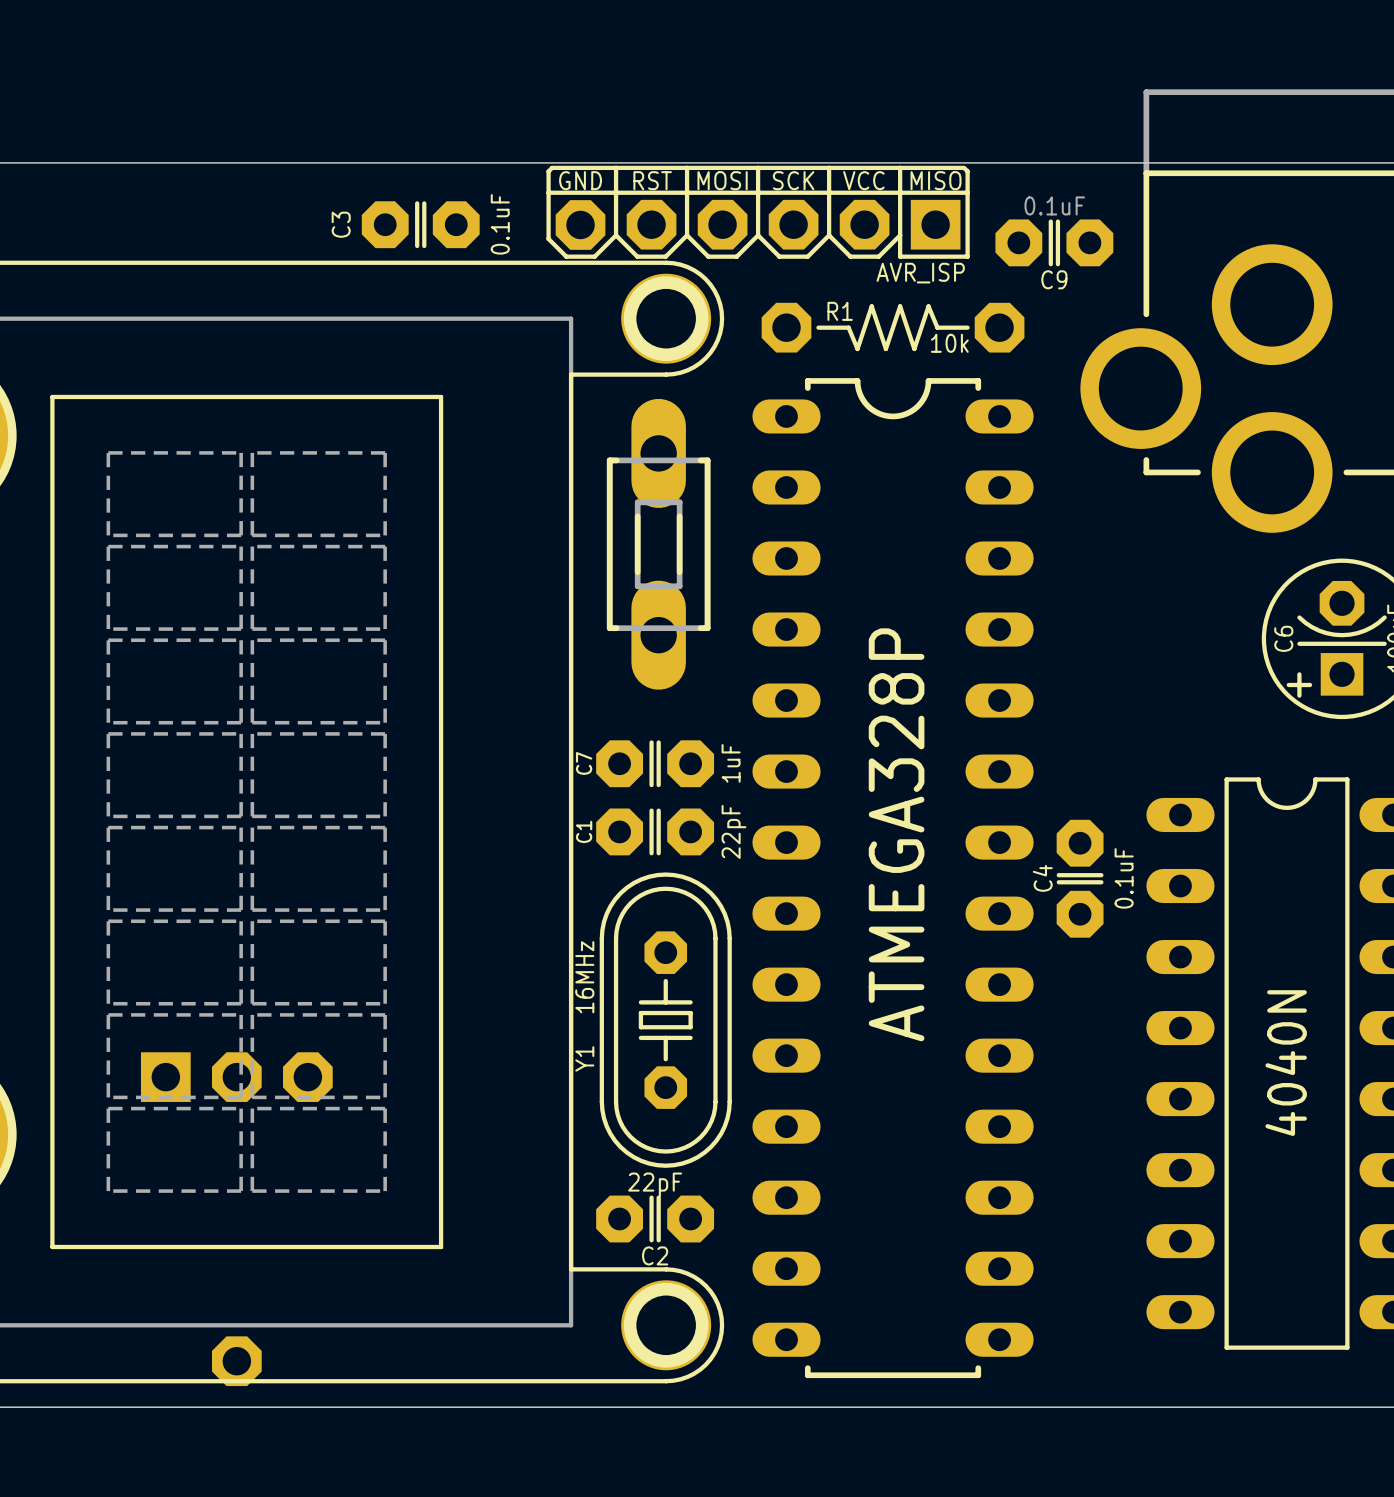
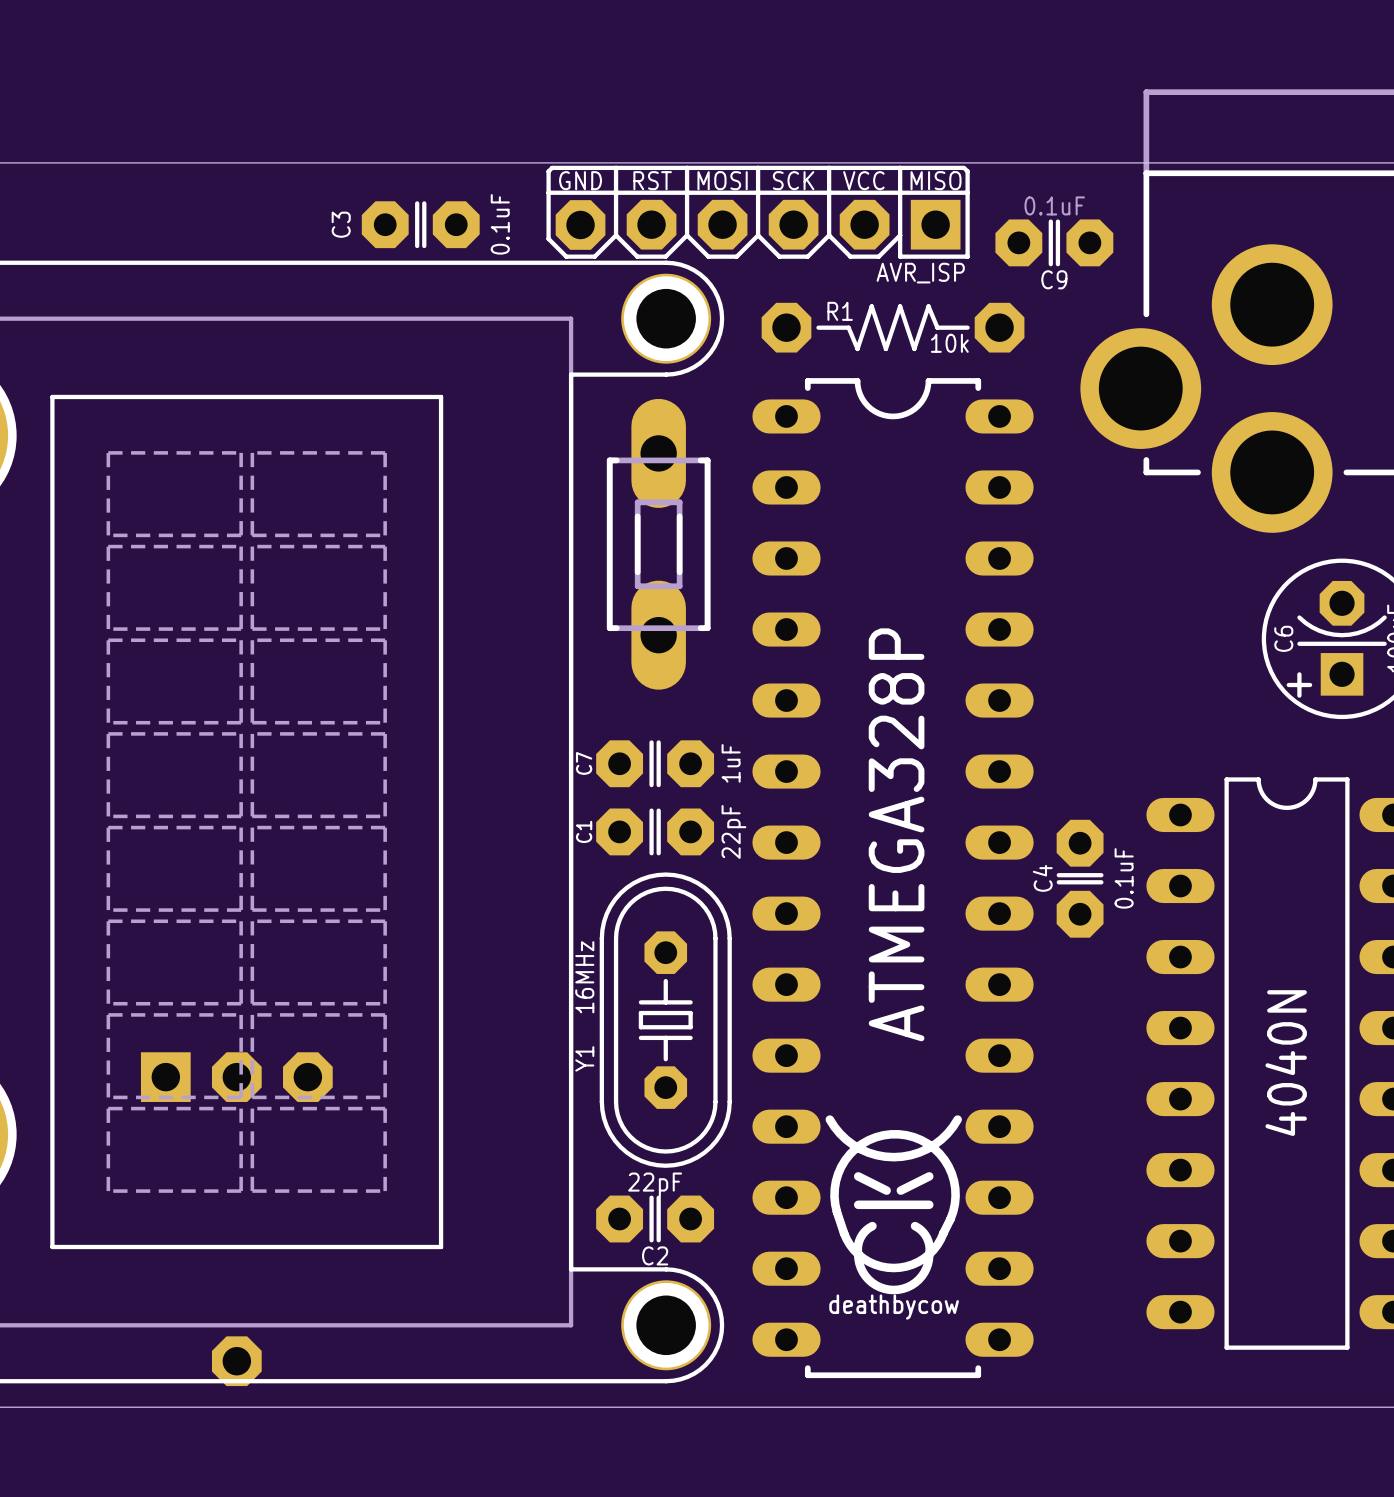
drawing: none -> [825, 1115, 962, 1295]

